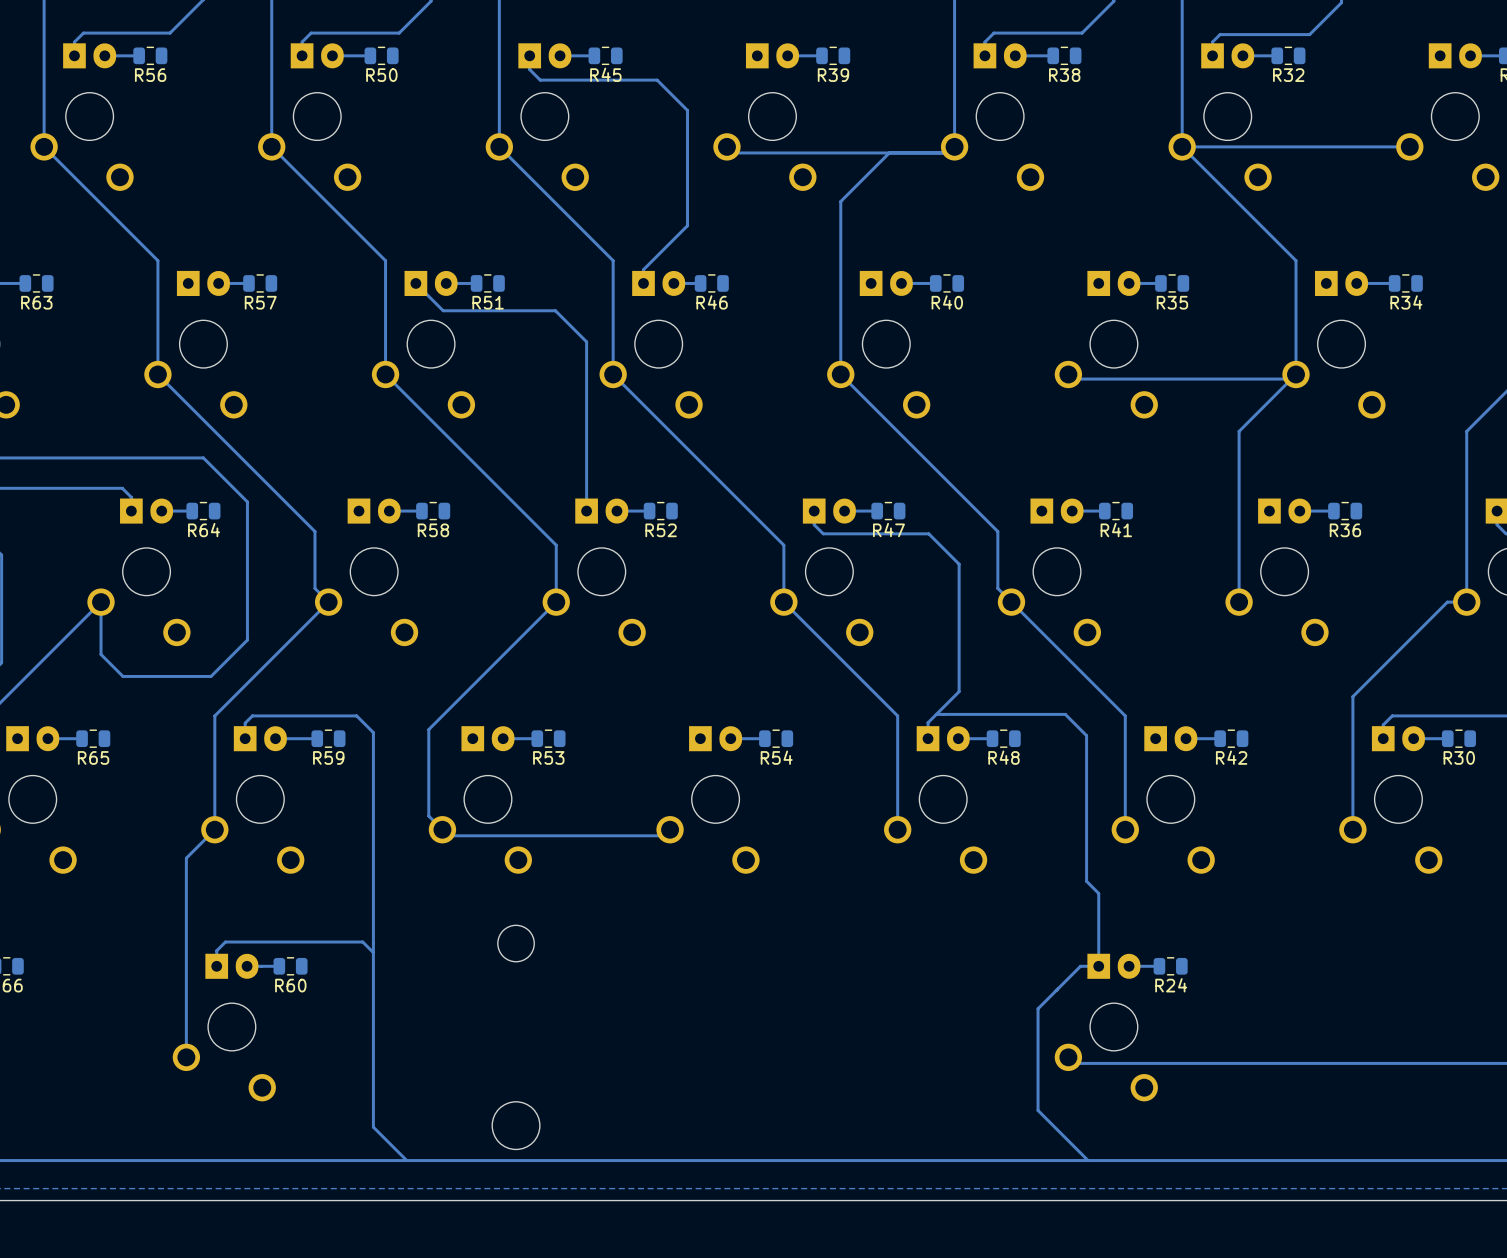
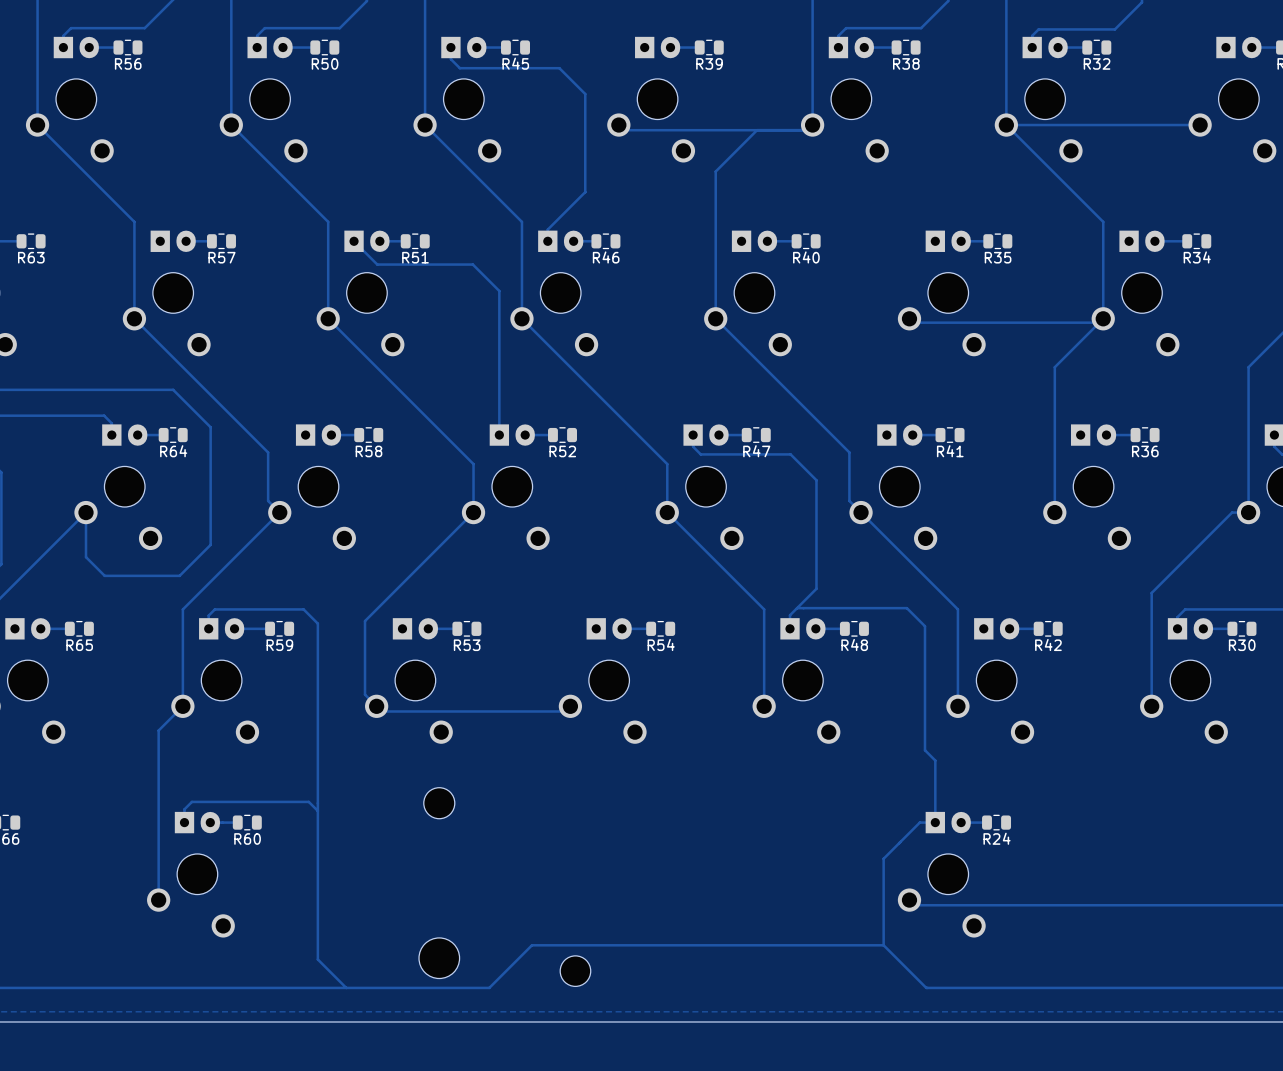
part: none -> (575, 971)
track: (1088, 1160) (574, 1160) -> (883, 945) (531, 945) (489, 987)

